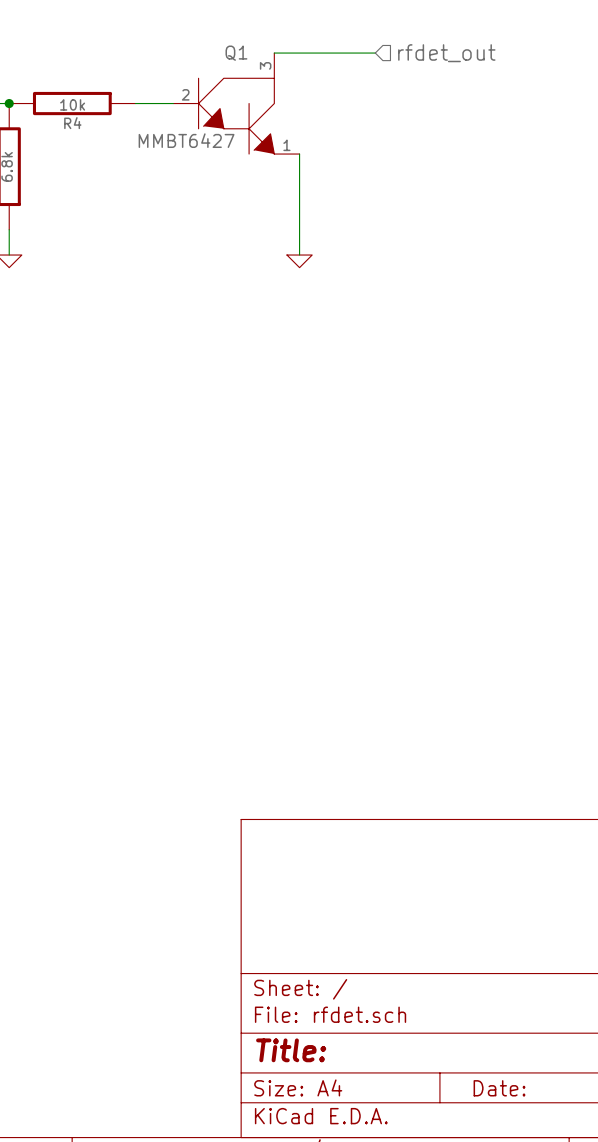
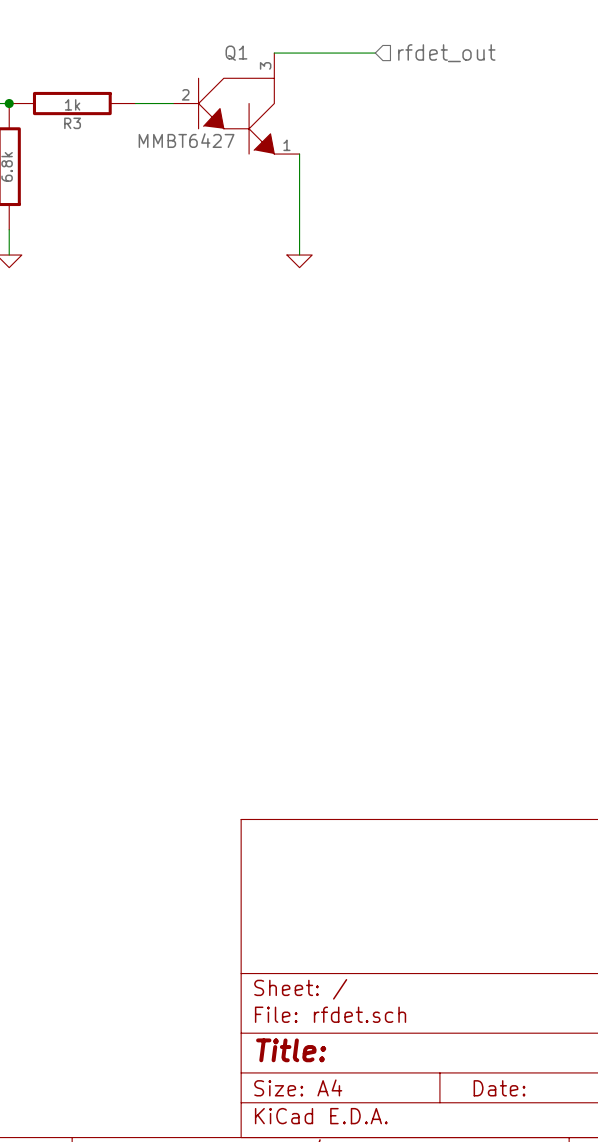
R4 value: 10k (72, 104) -> 1k (72, 104)
R4 name: R4 (72, 123) -> R3 (72, 123)

